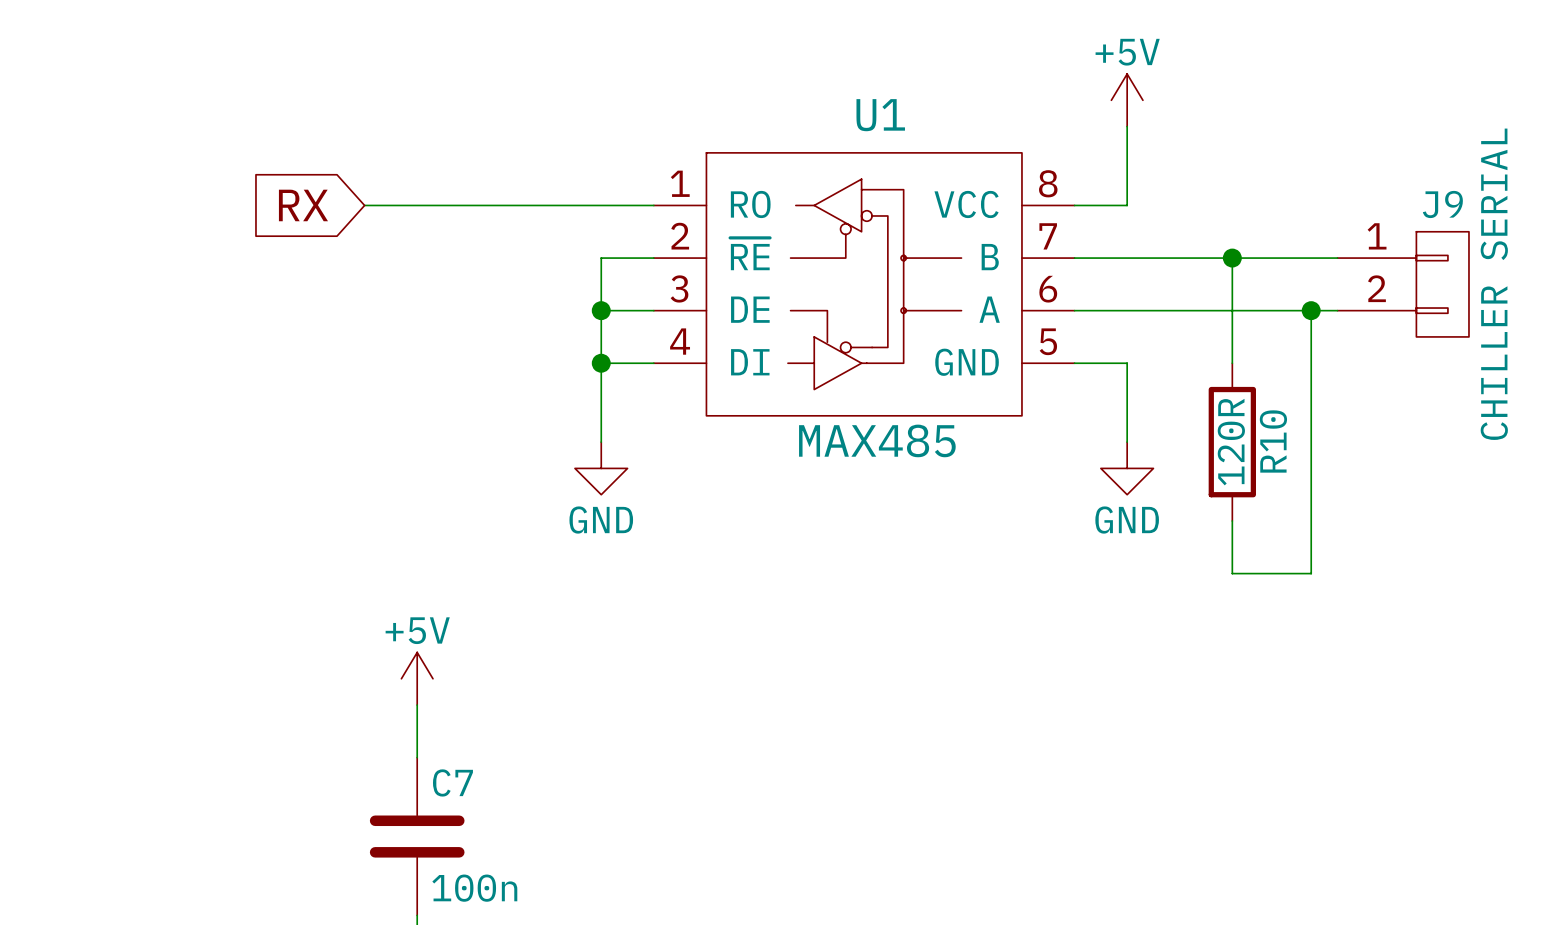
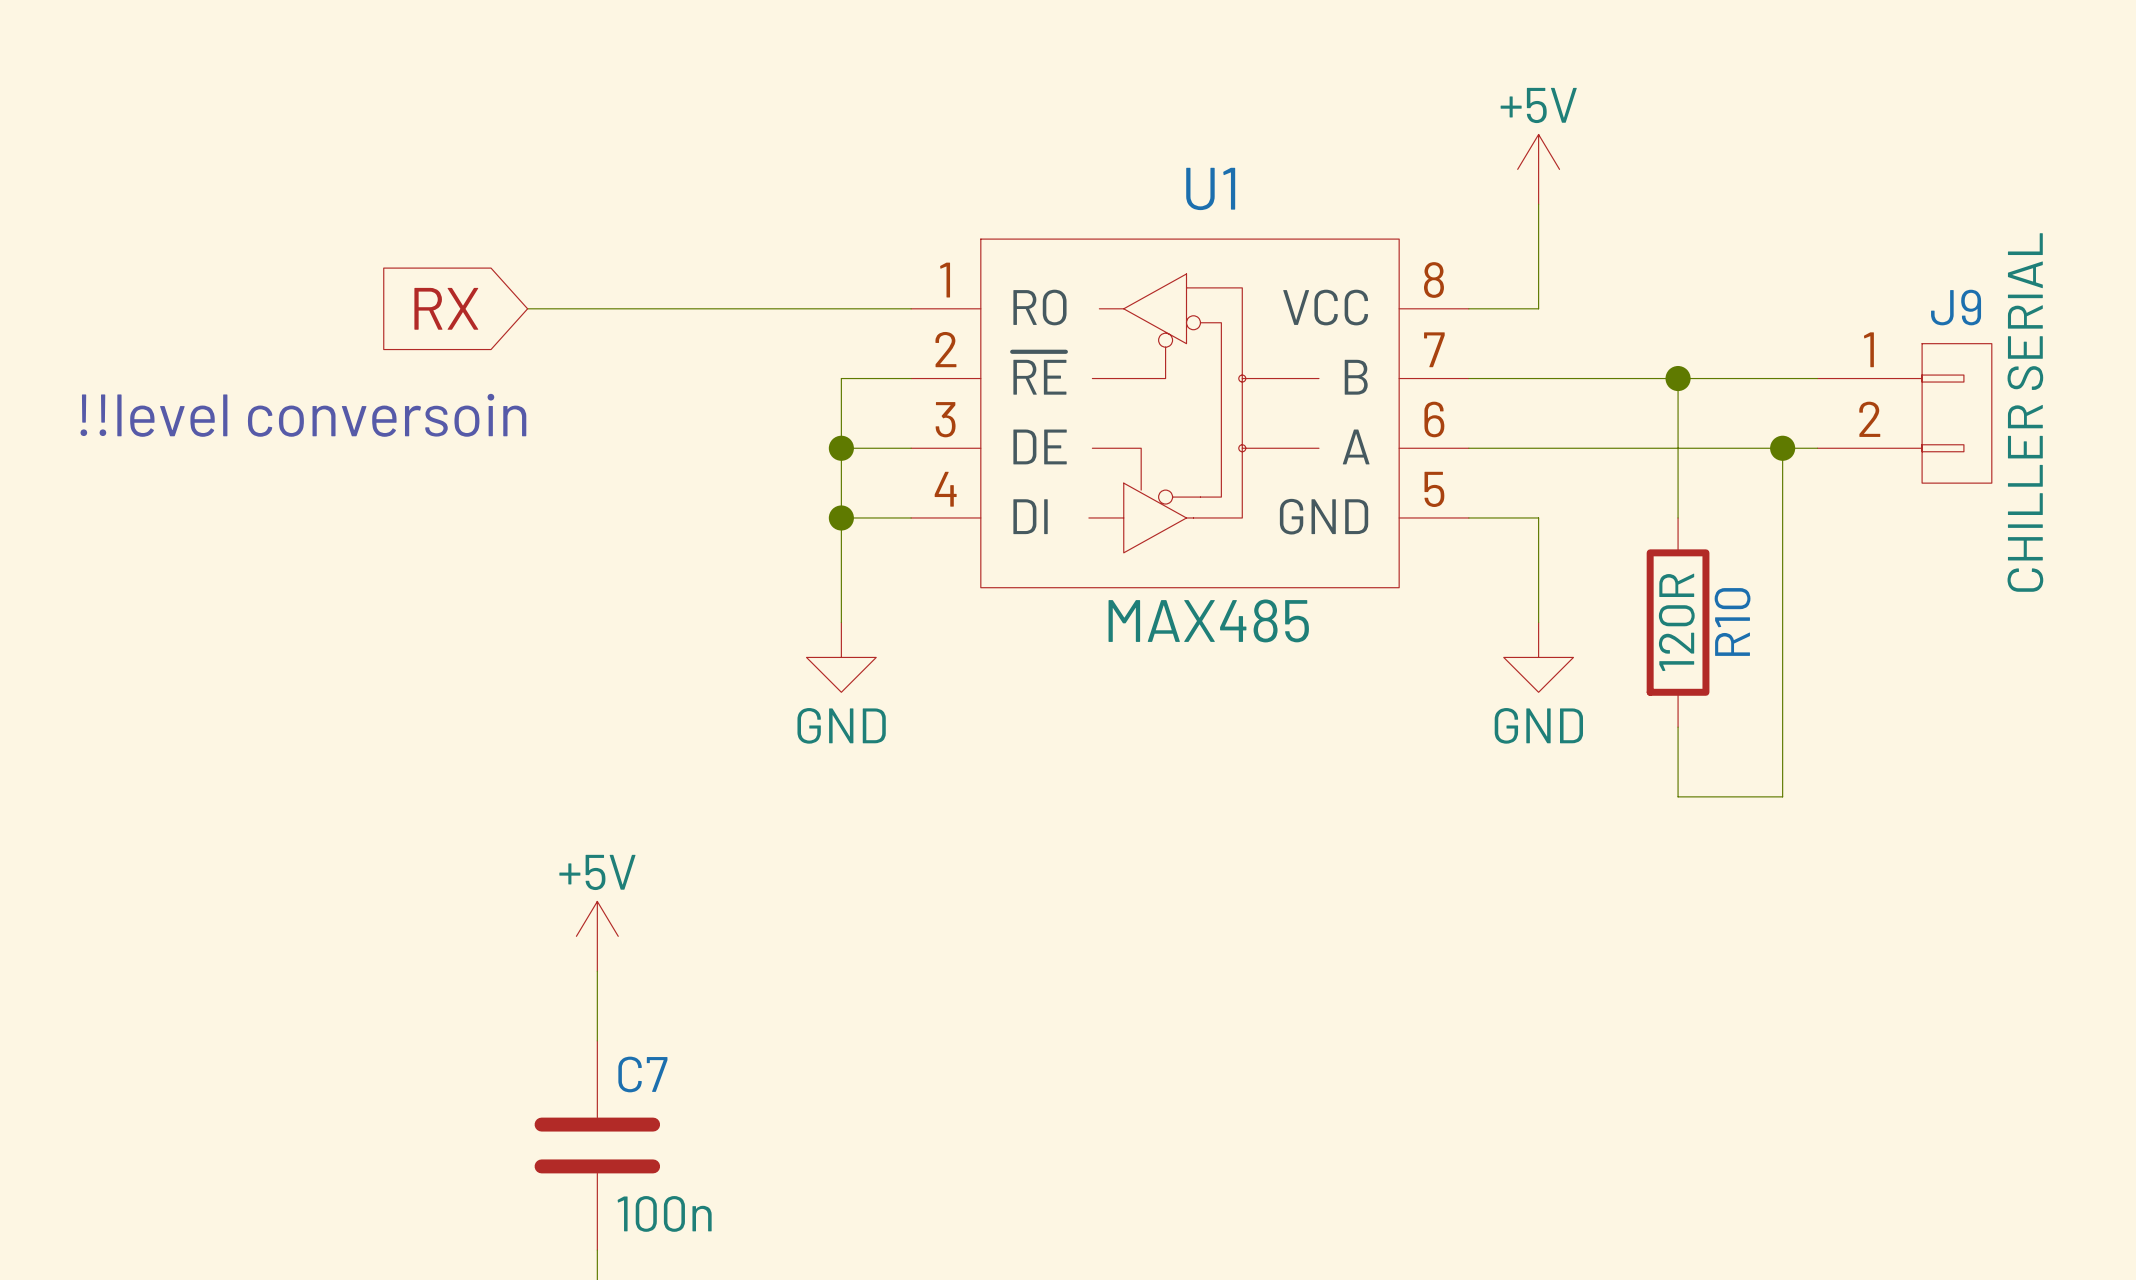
text: none -> !!level conversoin (303, 415)

